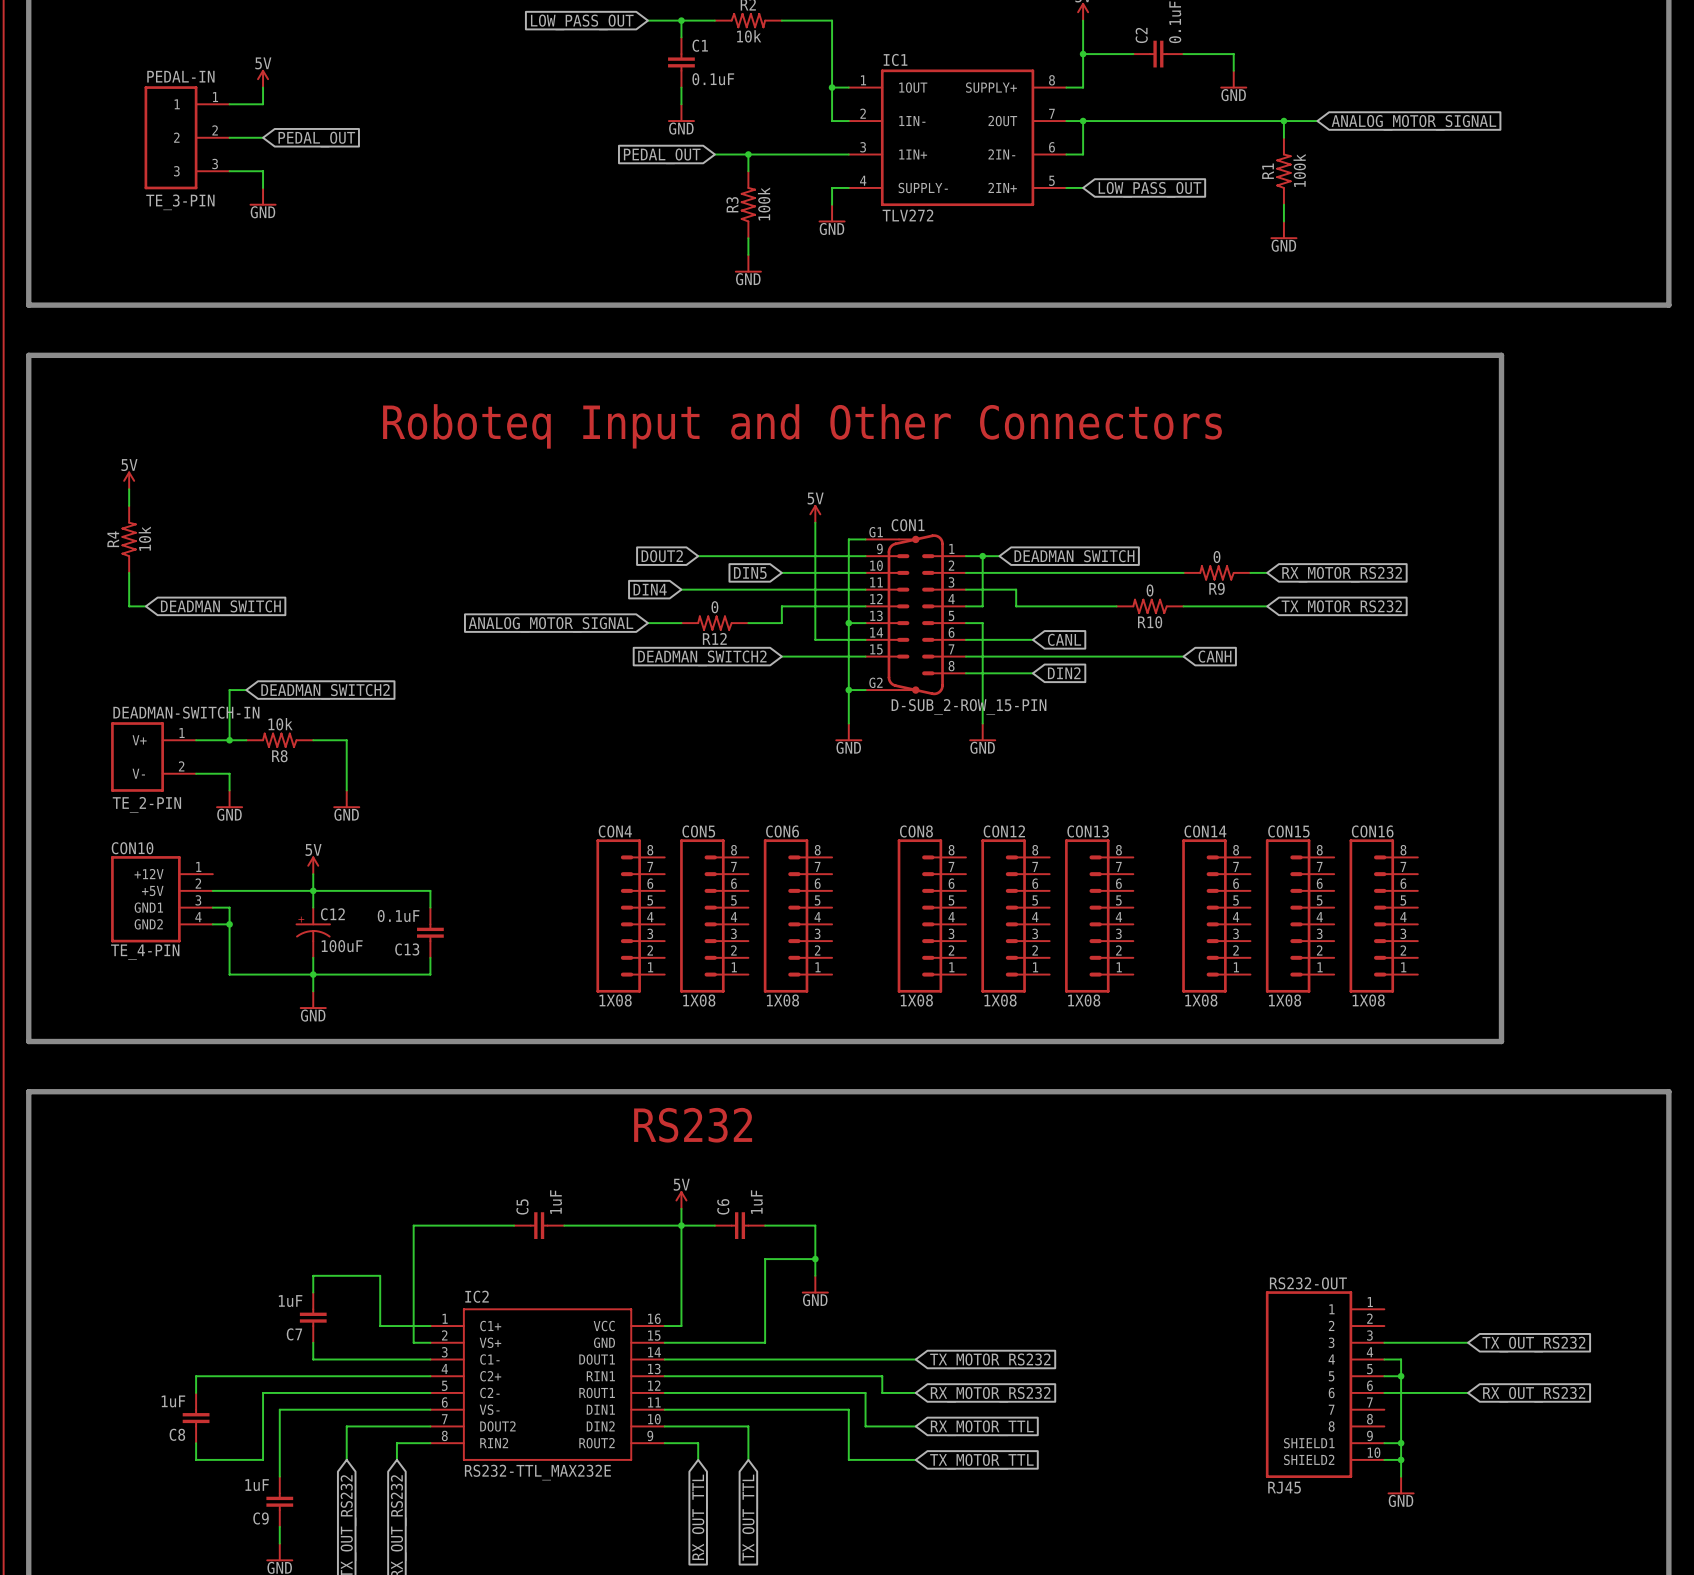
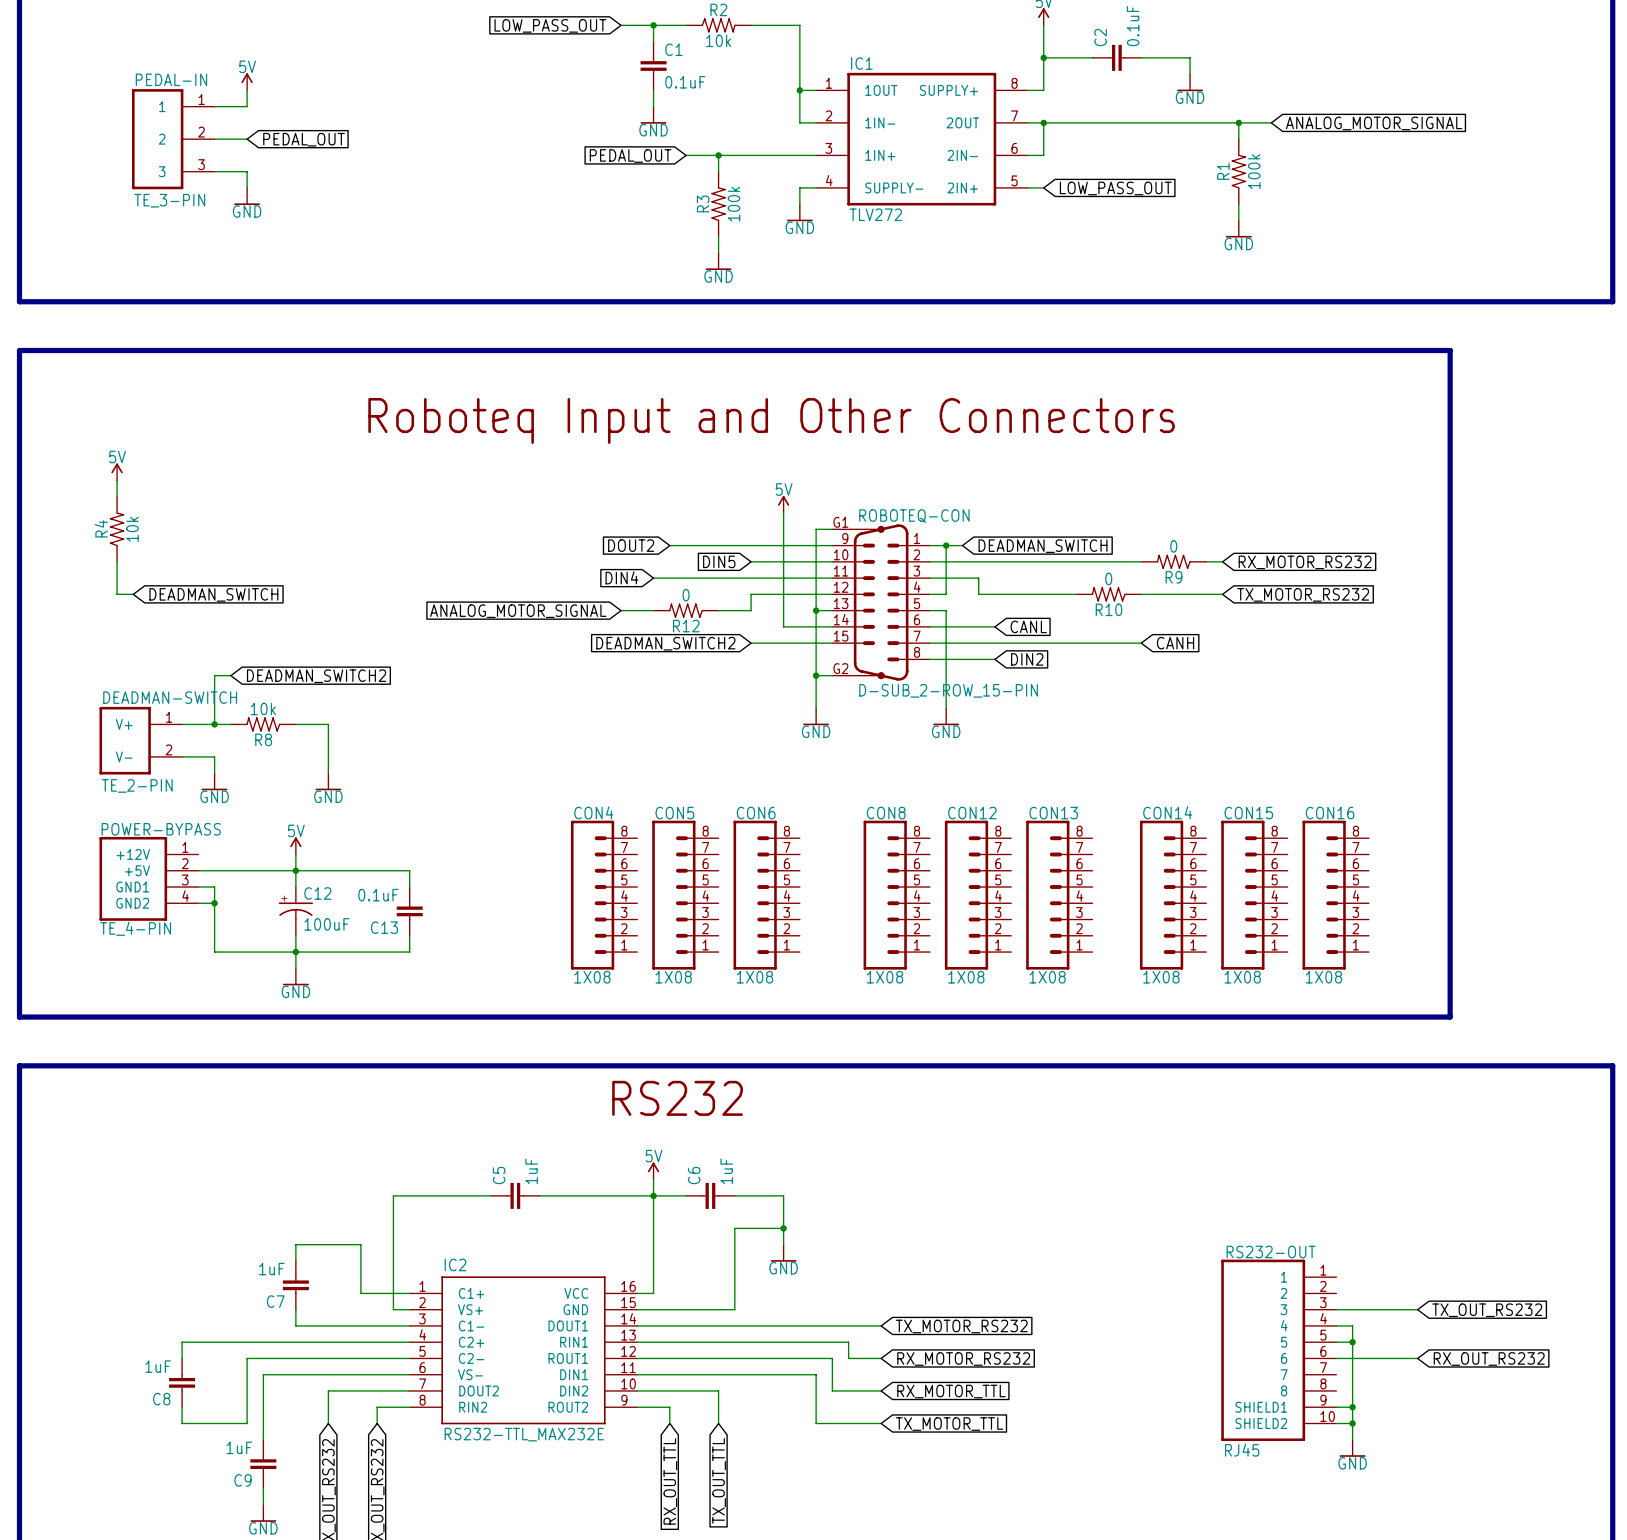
CON1 name: CON1 (908, 525) -> ROBOTEQ-CON (914, 516)
DEADMAN-SWITCH-IN name: DEADMAN-SWITCH-IN (186, 712) -> DEADMAN-SWITCH (170, 697)
CON10 name: CON10 (132, 848) -> POWER-BYPASS (161, 829)

